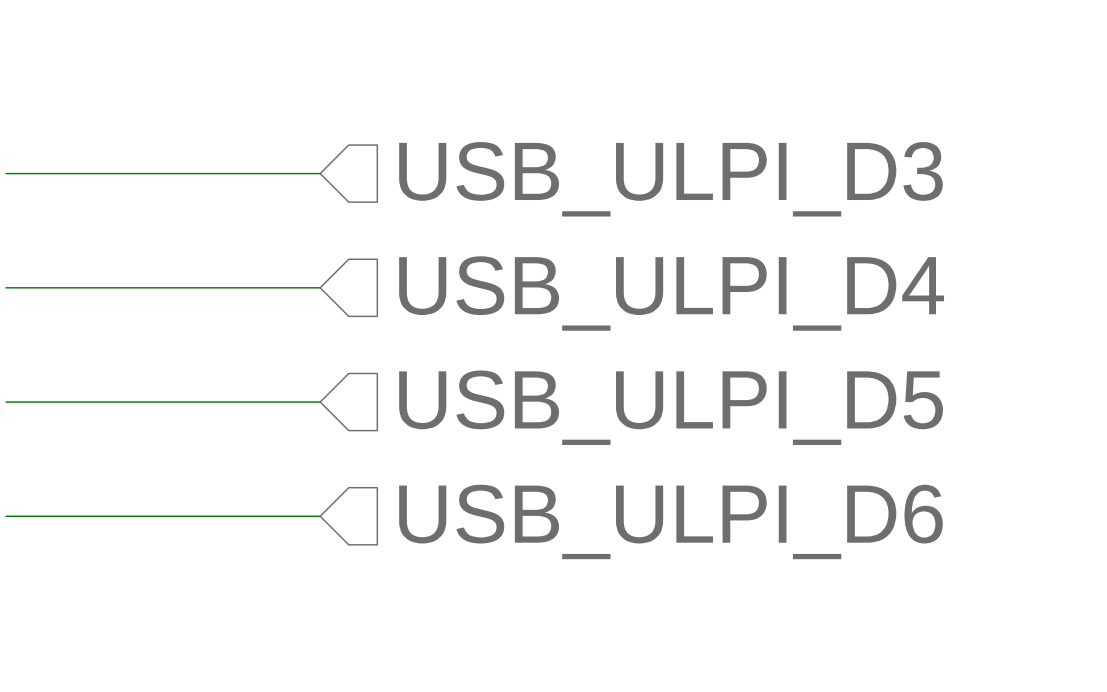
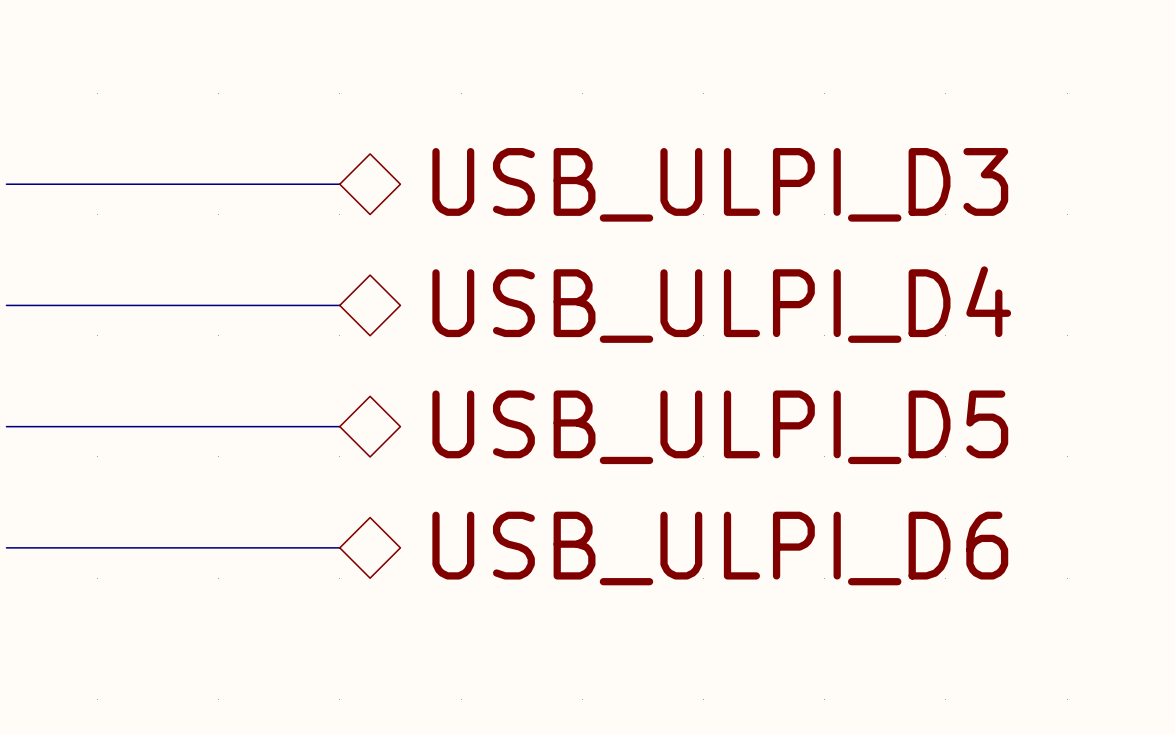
hierarchical label shape: input (670, 179) -> bidirectional (720, 184)
hierarchical label shape: input (671, 293) -> bidirectional (721, 304)
hierarchical label shape: input (671, 407) -> bidirectional (720, 427)
hierarchical label shape: input (670, 521) -> bidirectional (720, 548)

